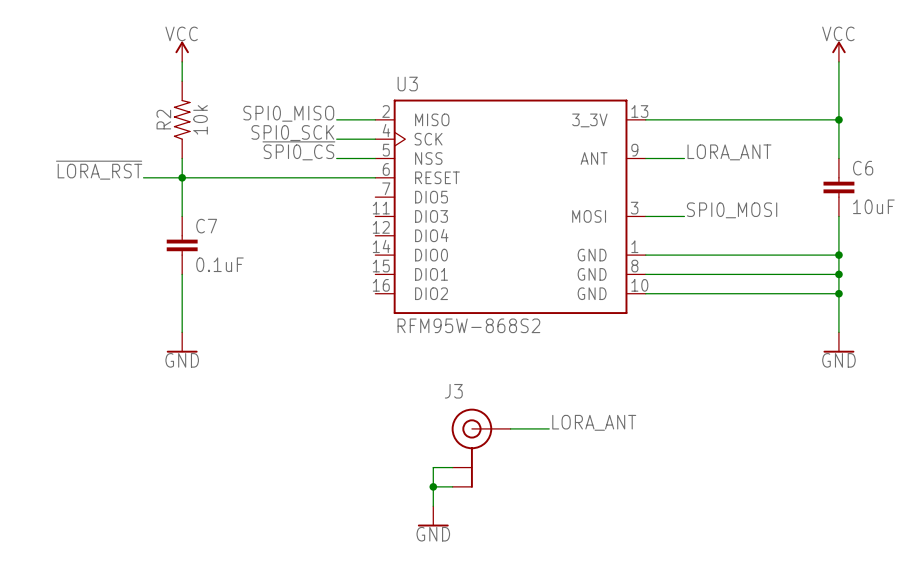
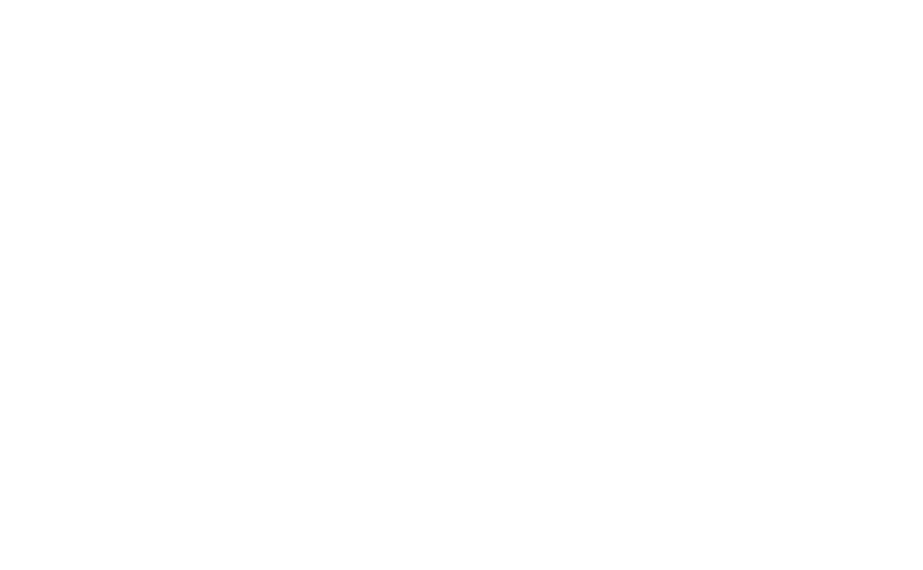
power symbol: VCC (182, 51) -> none
power symbol: VCC (838, 51) -> none
wire: (182, 61) (182, 81) -> none
wire: (838, 61) (838, 158) -> none
label: SPI0_MISO (288, 113) -> none
R2: 10k (182, 119) -> none
wire: (336, 119) (375, 119) -> none
wire: (645, 119) (838, 119) -> none
junction: (838, 119) -> none
label: SPI0_SCK (292, 133) -> none
wire: (336, 139) (375, 139) -> none
label: ~{SPI0_CS} (298, 150) -> none
label: LORA_ANT (729, 152) -> none
wire: (182, 158) (182, 216) -> none
wire: (336, 158) (375, 158) -> none
wire: (645, 158) (684, 158) -> none
label: ~{LORA_RST} (99, 170) -> none
wire: (143, 177) (375, 177) -> none
junction: (182, 177) -> none
C6: 10uF (838, 187) -> none
U3: RFM95W-868S2 (510, 206) -> none
label: SPI0_MOSI (732, 210) -> none
wire: (645, 216) (684, 216) -> none
wire: (838, 216) (838, 332) -> none
C7: 0.1uF (182, 245) -> none
wire: (645, 255) (838, 255) -> none
junction: (838, 255) -> none
wire: (182, 274) (182, 332) -> none
wire: (645, 274) (838, 274) -> none
junction: (838, 274) -> none
wire: (645, 293) (838, 293) -> none
junction: (838, 293) -> none
power symbol: GND (182, 342) -> none
power symbol: GND (838, 342) -> none
label: LORA_ANT (594, 422) -> none
wire: (510, 428) (549, 428) -> none
J3: (481, 448) -> none
wire: (452, 467) (433, 467) (433, 506) -> none
wire: (433, 486) (452, 486) -> none
junction: (433, 486) -> none
power symbol: GND (433, 516) -> none

